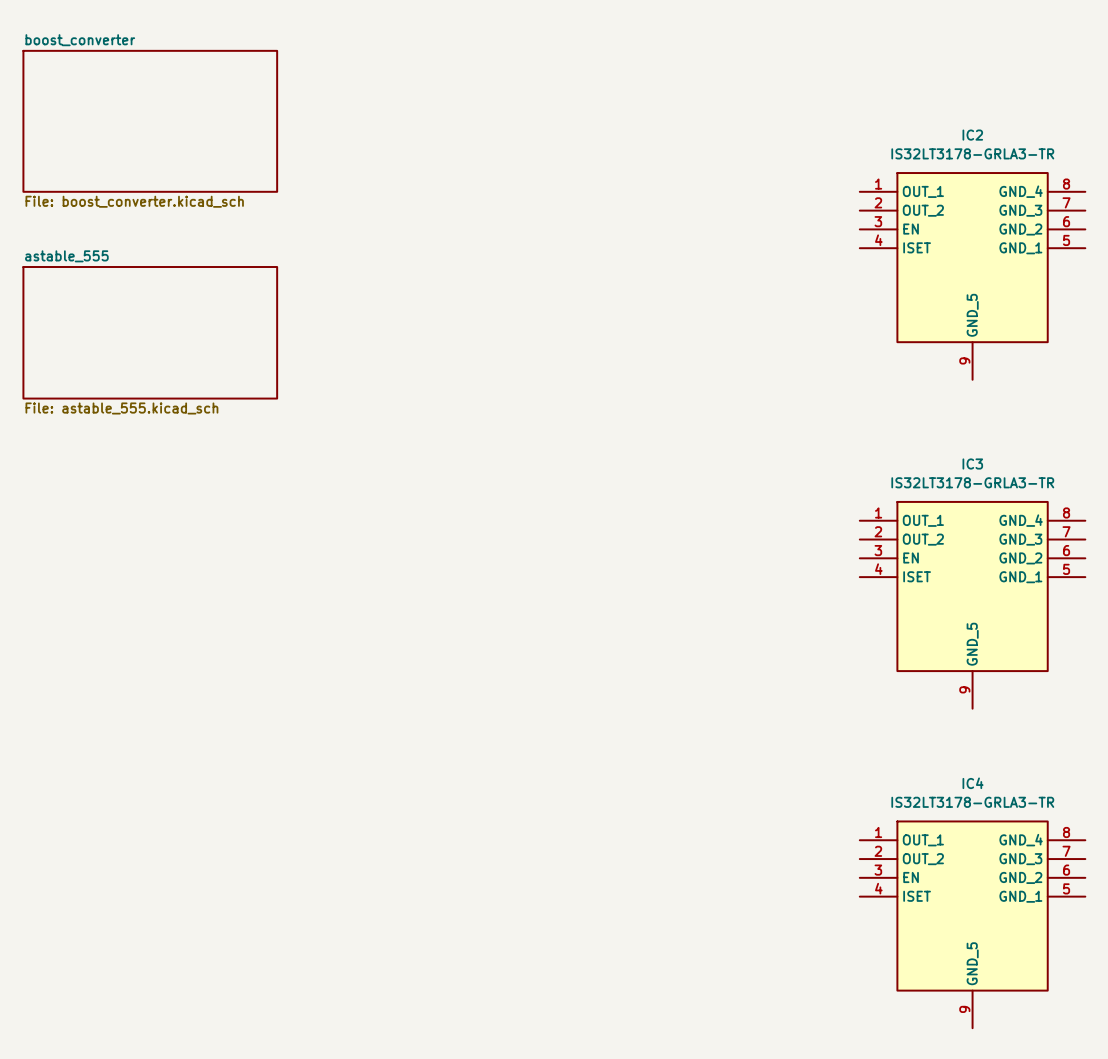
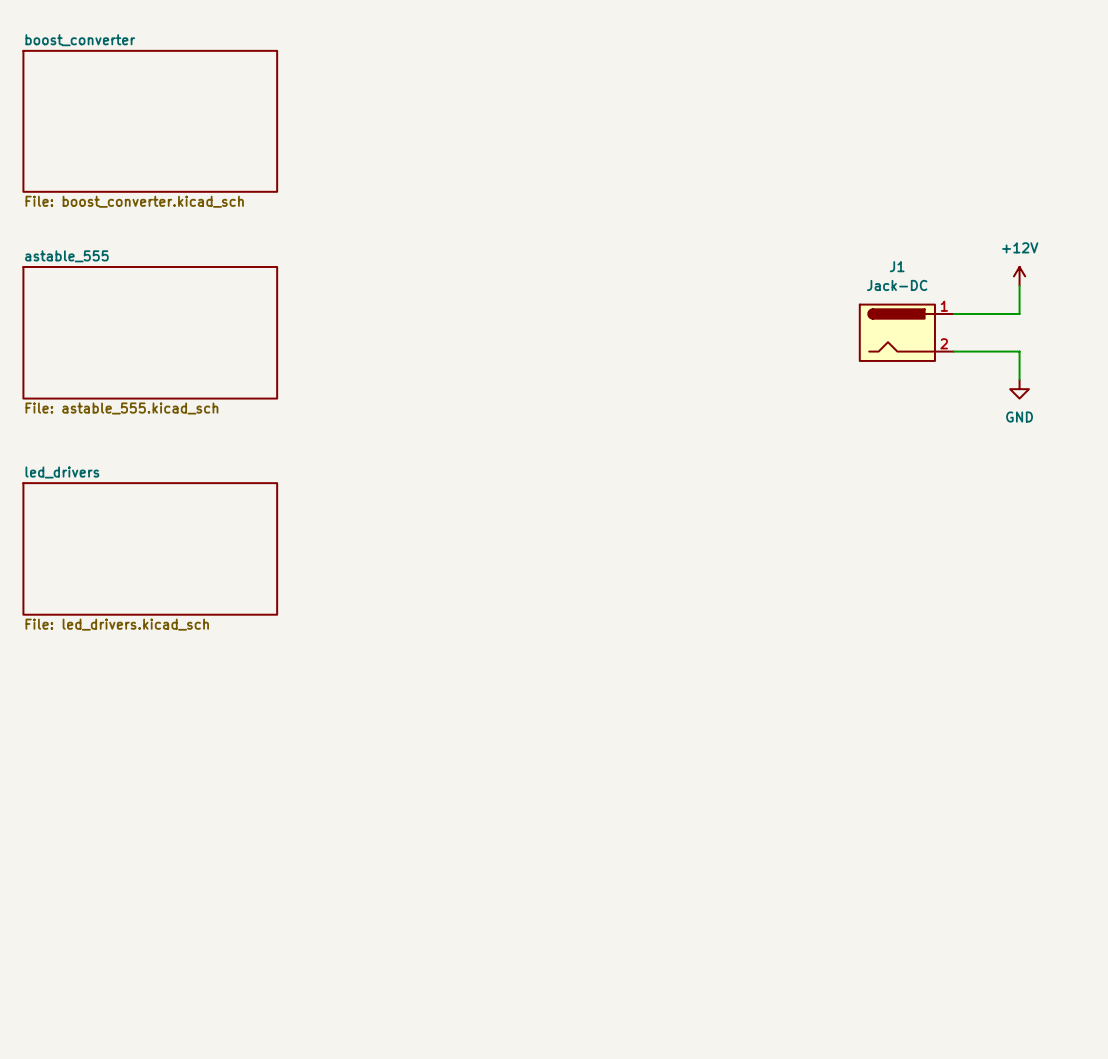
IC2: IS32LT3178-GRLA3-TR (972, 275) -> none
power symbol: none -> +12V (1019, 276)
J1: none -> Jack-DC (906, 332)
wire: none -> (953, 351) (1019, 351) (1019, 379)
power symbol: none -> GND (1019, 389)
sheet led_drivers: none -> File: led_drivers.kicad_sch (150, 548)
IC3: IS32LT3178-GRLA3-TR (972, 604) -> none
IC4: IS32LT3178-GRLA3-TR (972, 924) -> none

